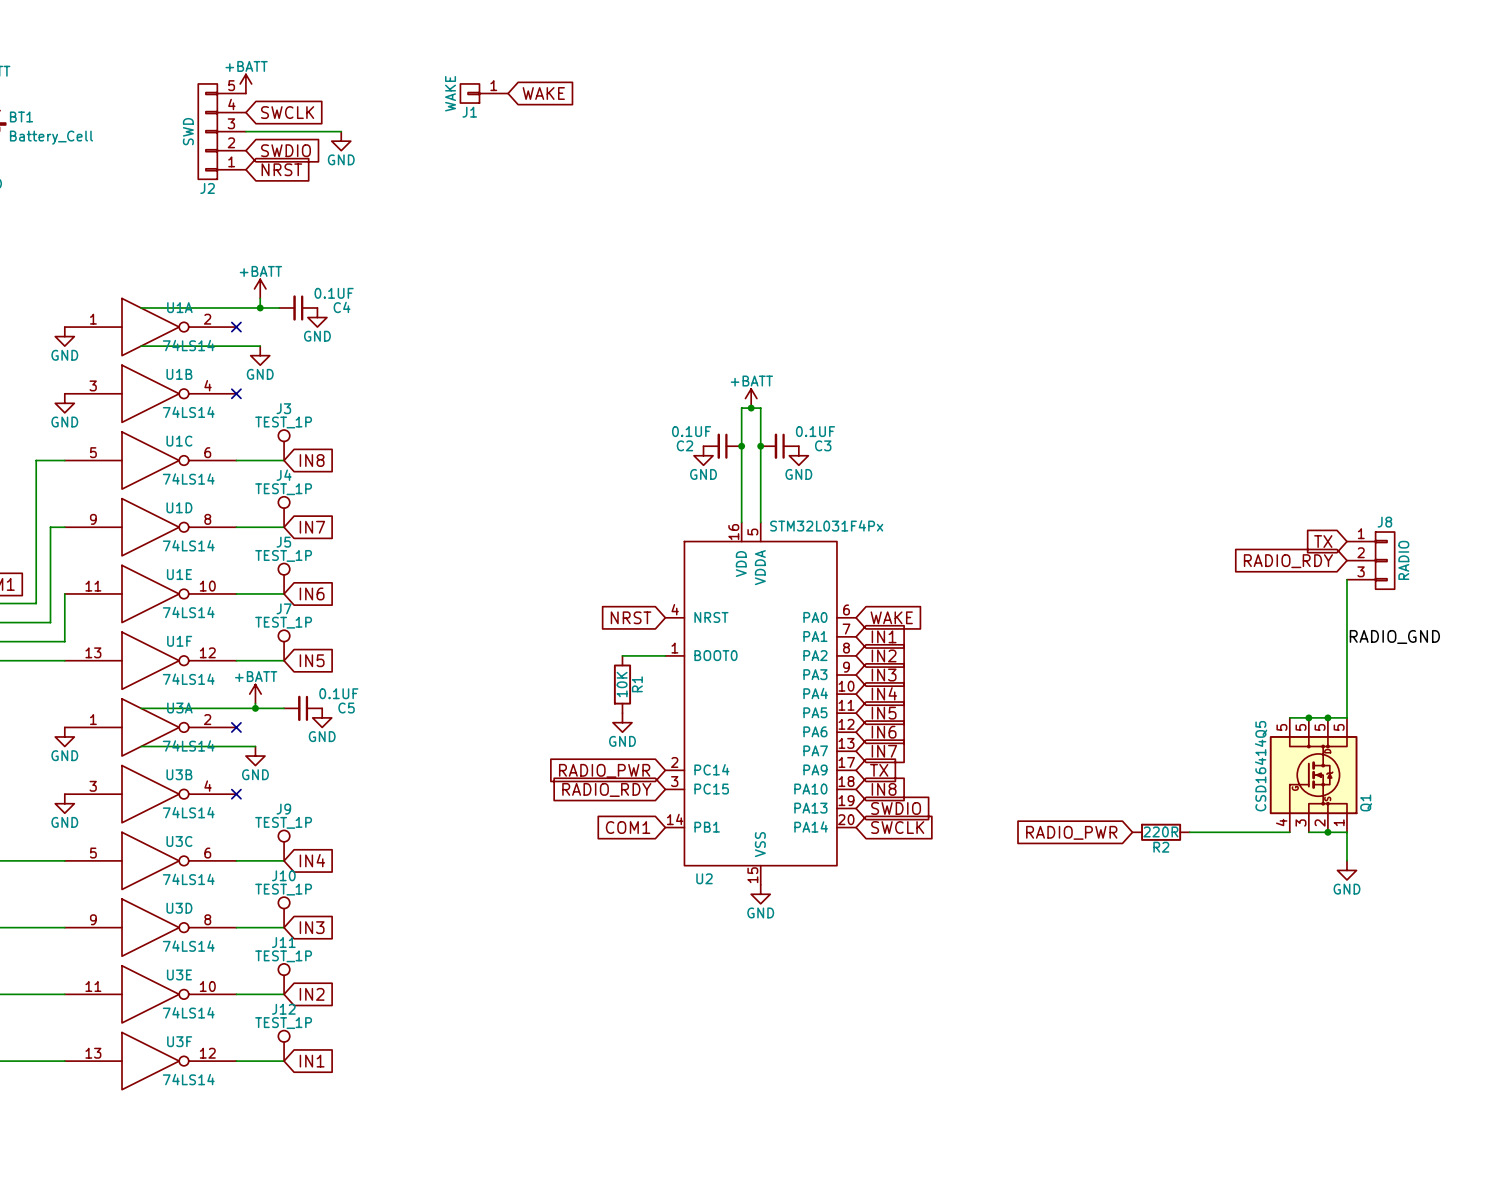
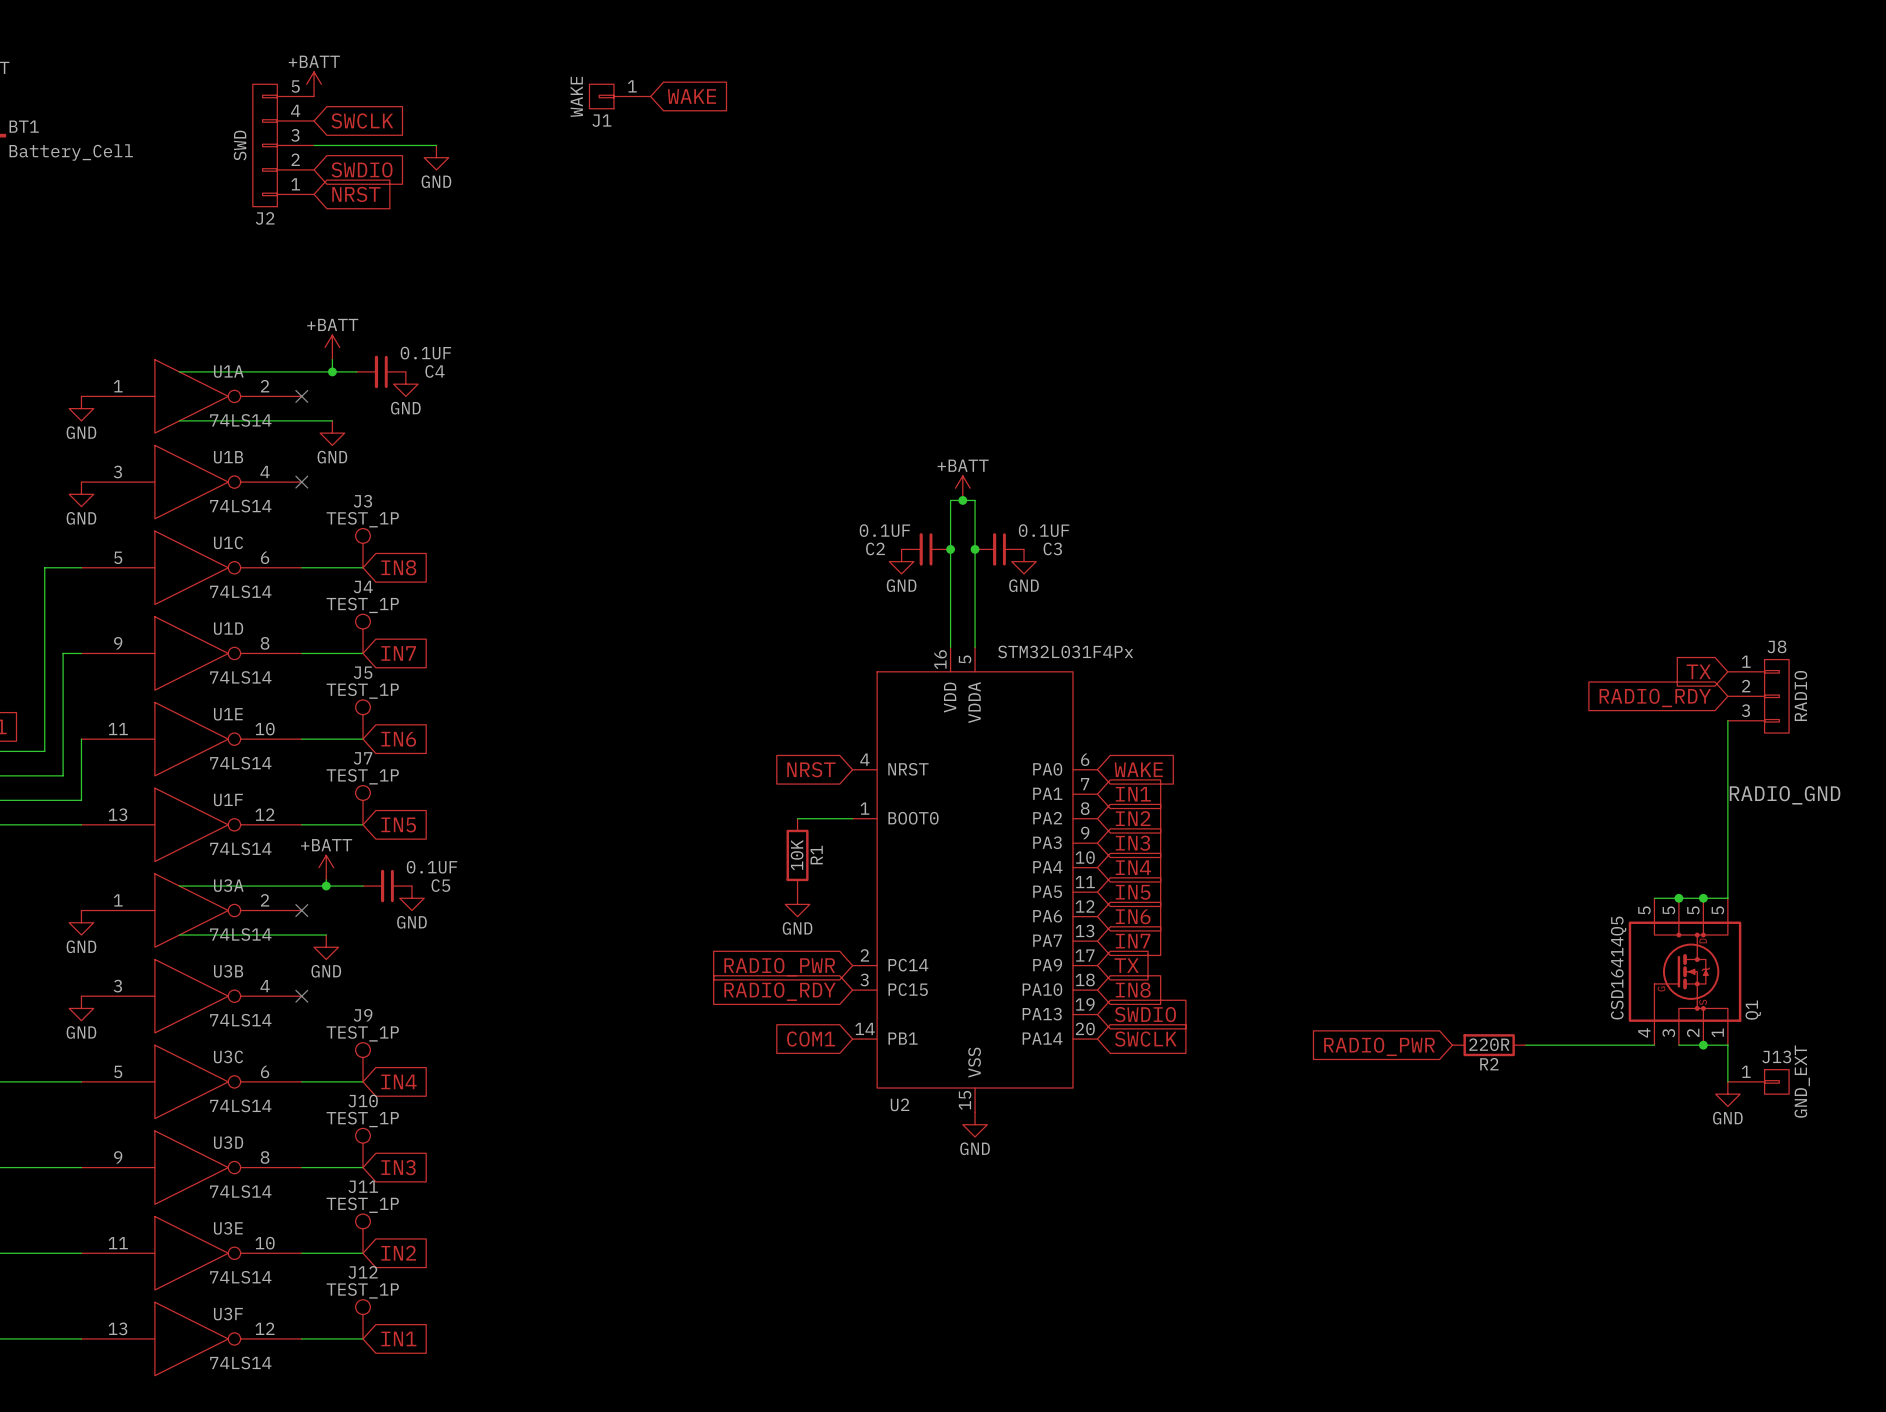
J13: none -> GND_EXT (1758, 1081)

